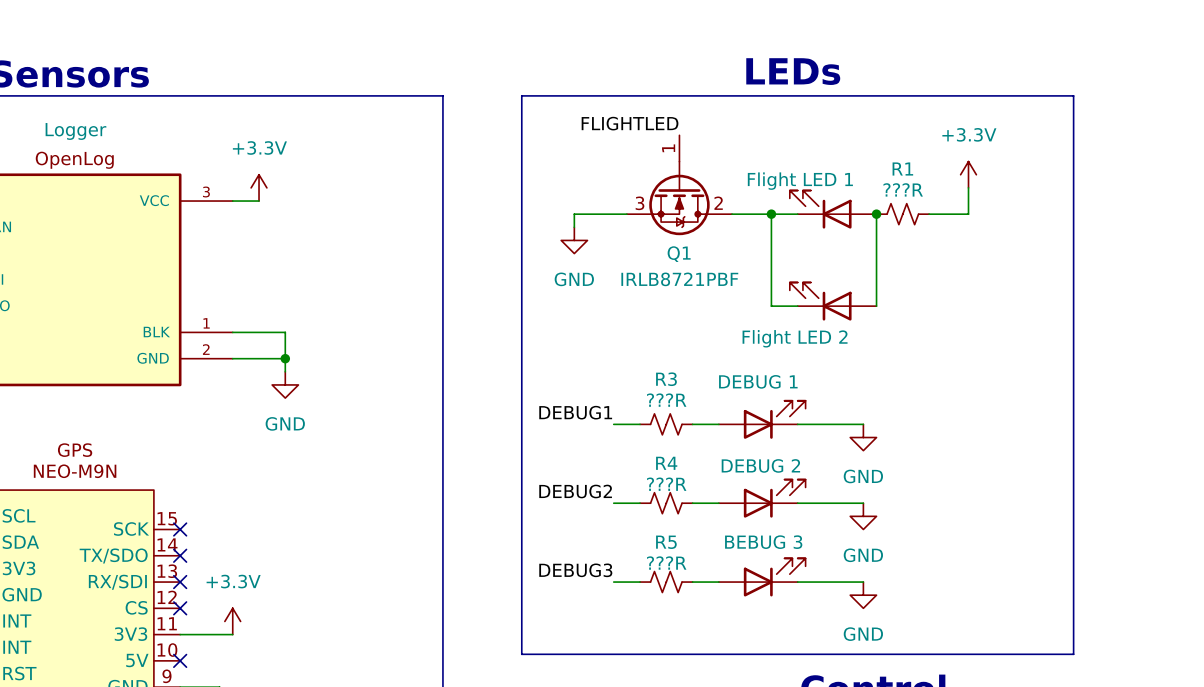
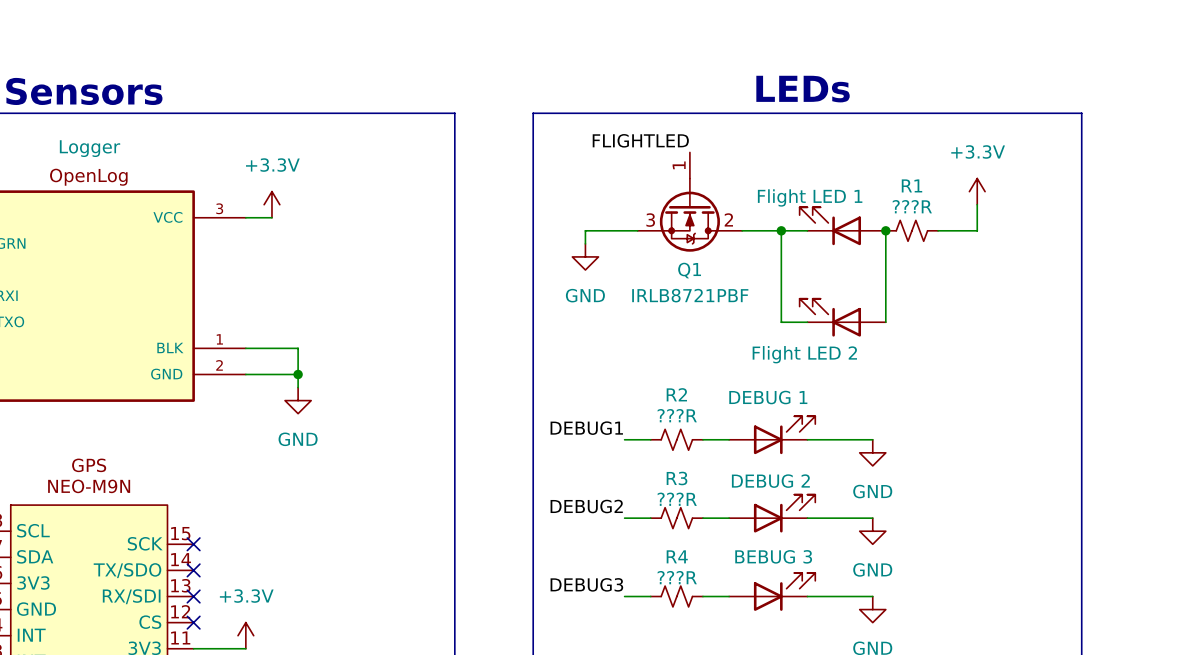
R3 name: R3 (666, 379) -> R2 (676, 394)
R4 name: R4 (666, 463) -> R3 (677, 478)
R5 name: R5 (666, 542) -> R4 (677, 556)

